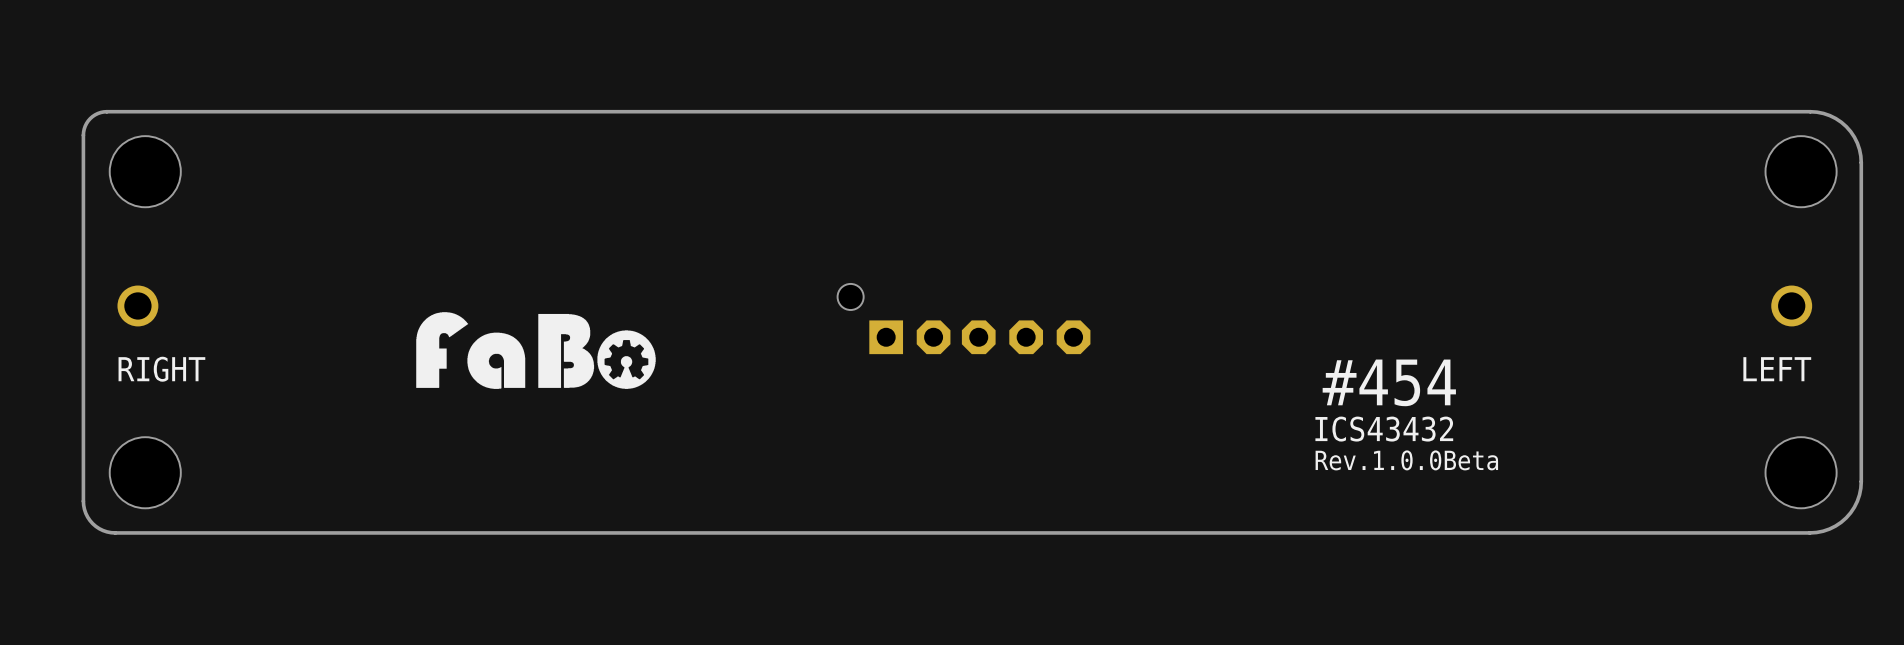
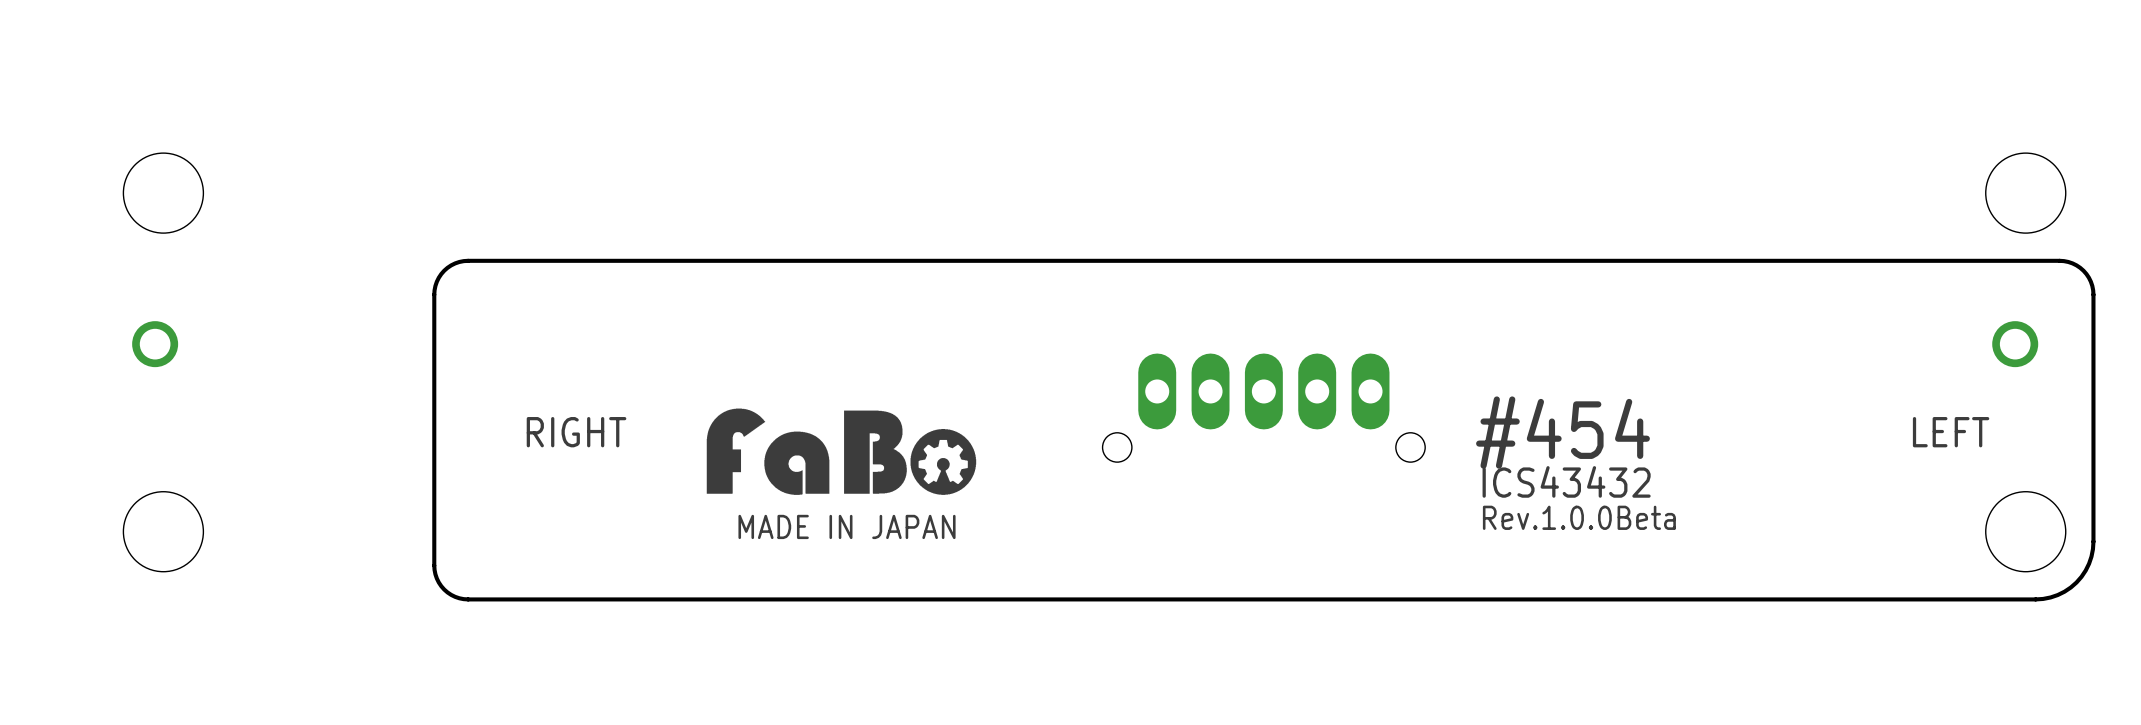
board edge: (1861, 262) (1861, 162) (1859, 149) (1850, 131) (1841, 122) (1829, 115) (1816, 112) (106, 111) (92, 116) (85, 126) (83, 135) (83, 501) (85, 513) (89, 520) (99, 528) (115, 532) (416, 532) -> (2093, 294) (2090, 281) (2083, 270) (2072, 263) (2059, 260) (463, 261) (451, 265) (444, 270) (438, 277) (434, 290) (434, 565) (436, 578) (444, 589) (455, 596) (468, 599)
part: (964, 319) -> none
drawing position: (535, 350) -> (841, 451)
part: none -> (1263, 407)
text position: RIGHT (161, 369) -> RIGHT (576, 432)
text position: LEFT (1777, 369) -> LEFT (1951, 432)
text: none -> MADE IN JAPAN (847, 526)

